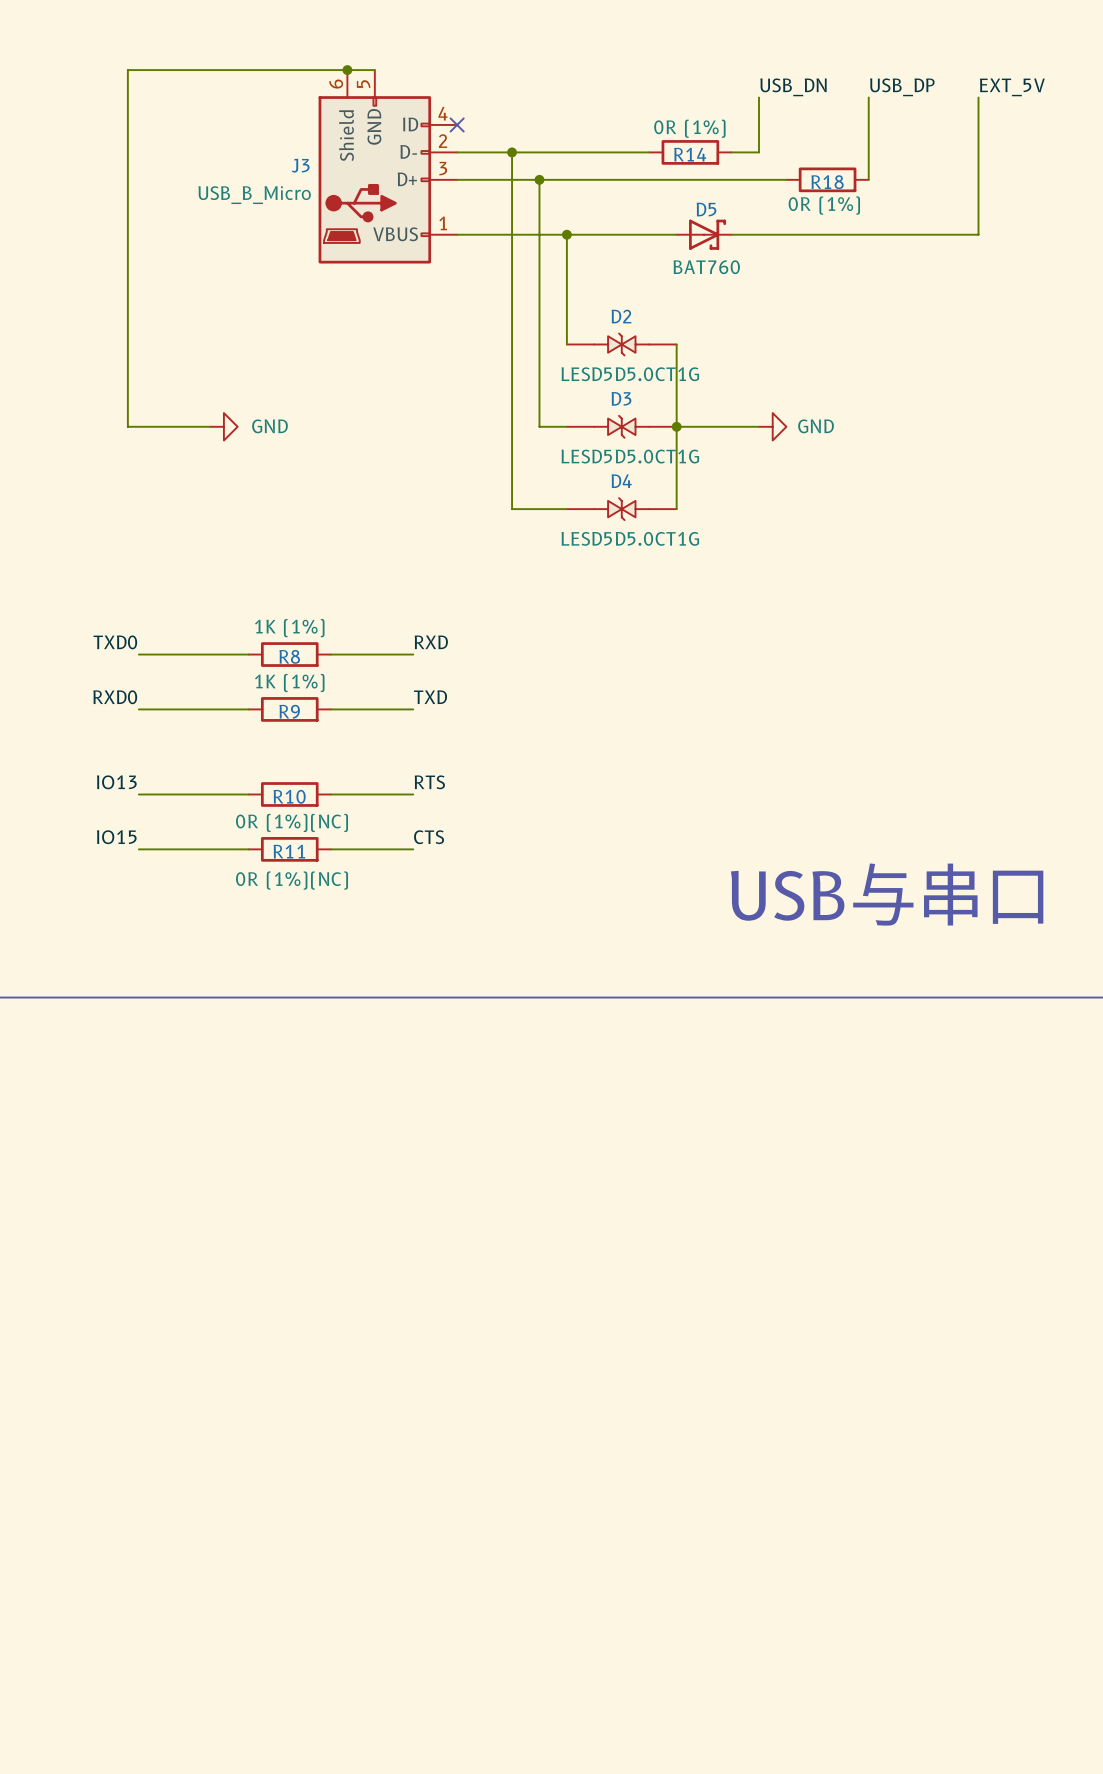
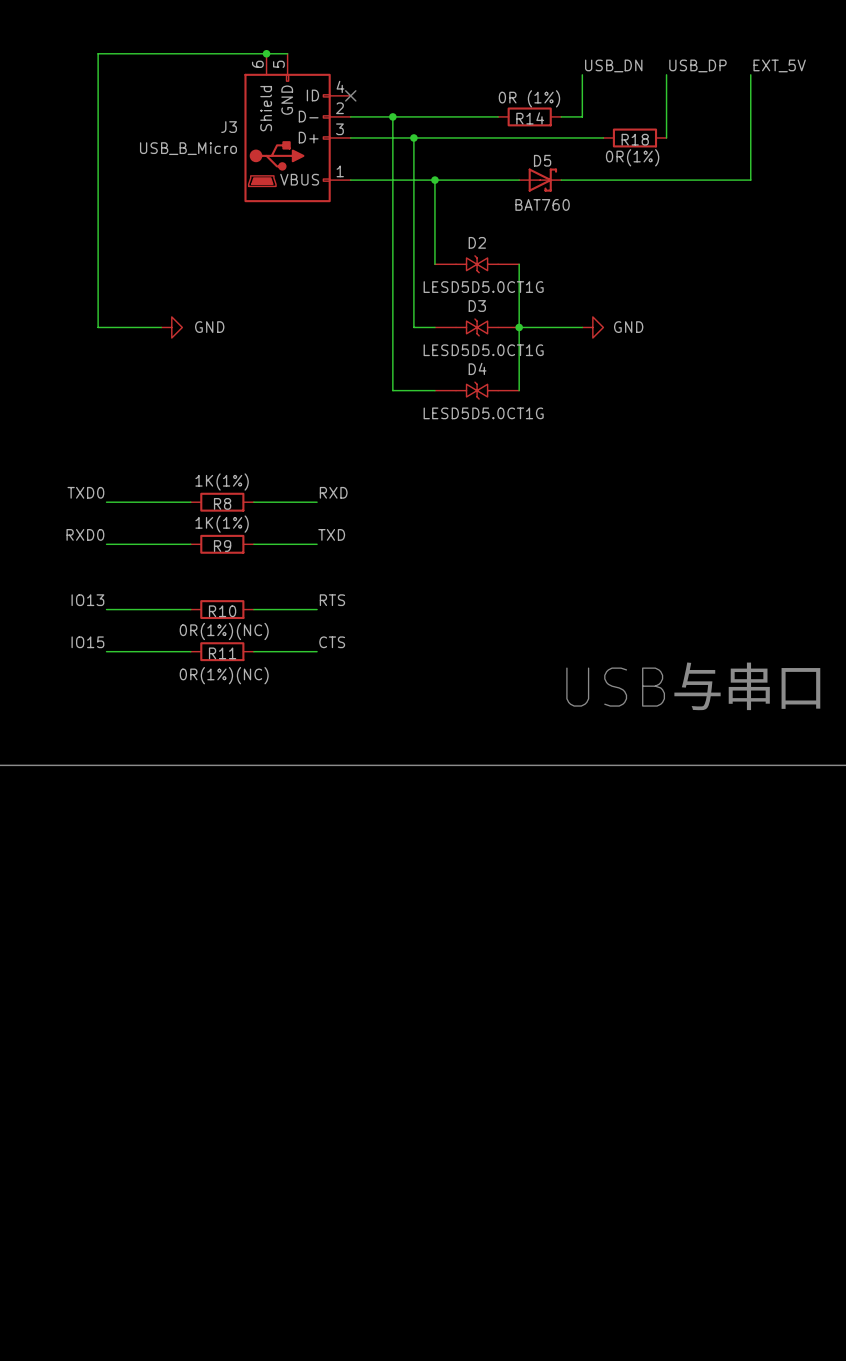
R18 value: 0R (1%) (824, 205) -> 0R(1%) (632, 157)
R8 value: 1K (1%) (289, 628) -> 1K(1%) (222, 482)
R9 value: 1K (1%) (289, 683) -> 1K(1%) (222, 524)
R10 value: 0R (1%)(NC) (292, 822) -> 0R(1%)(NC) (224, 631)
R11 value: 0R (1%)(NC) (292, 880) -> 0R(1%)(NC) (224, 675)

